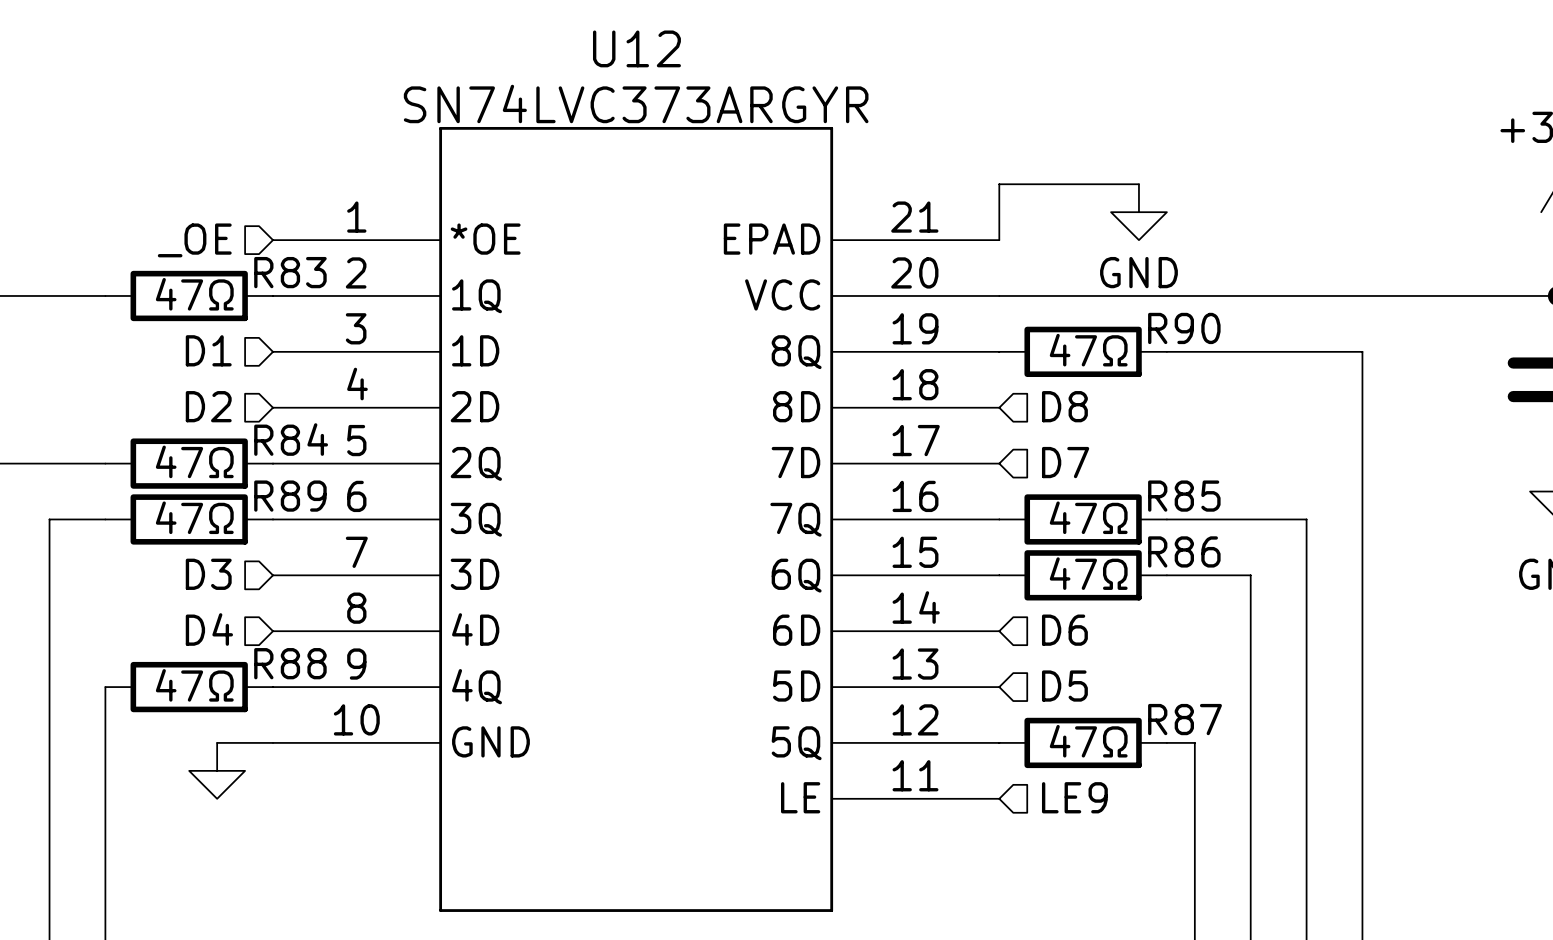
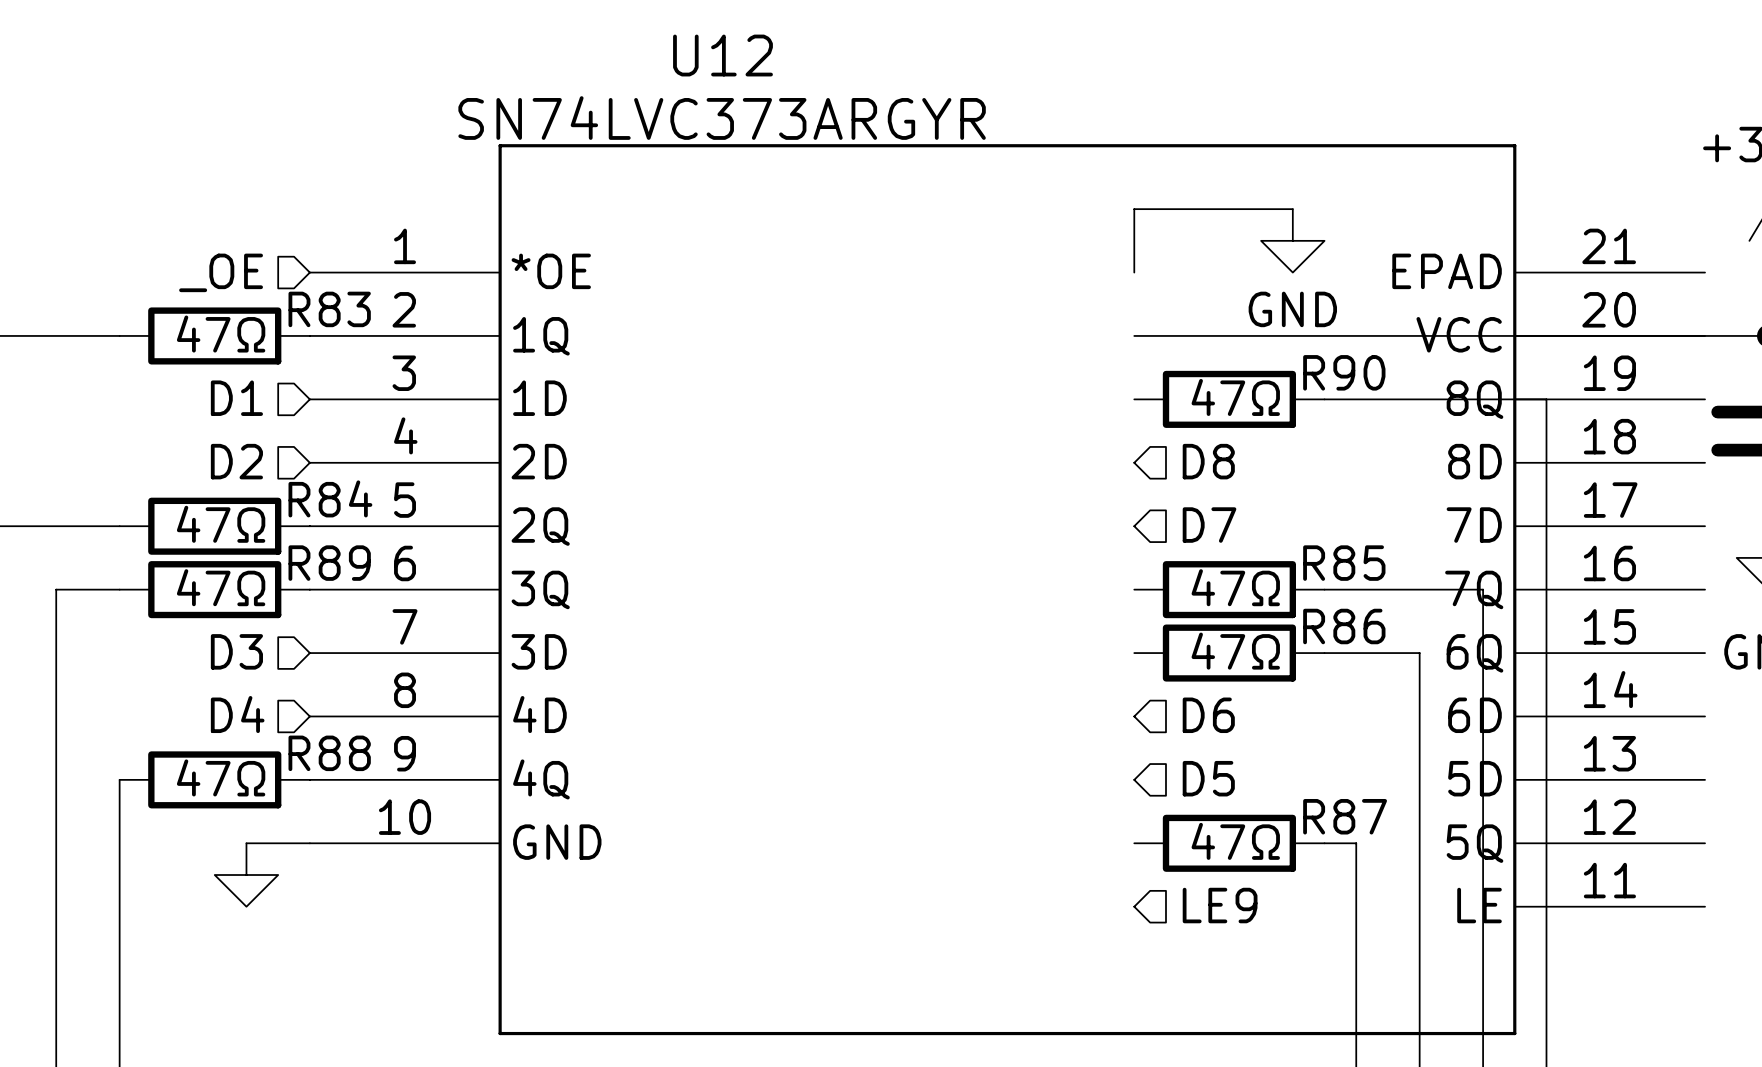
U12 symbol: [273, 126, 1000, 912] -> [309, 144, 1706, 1036]

